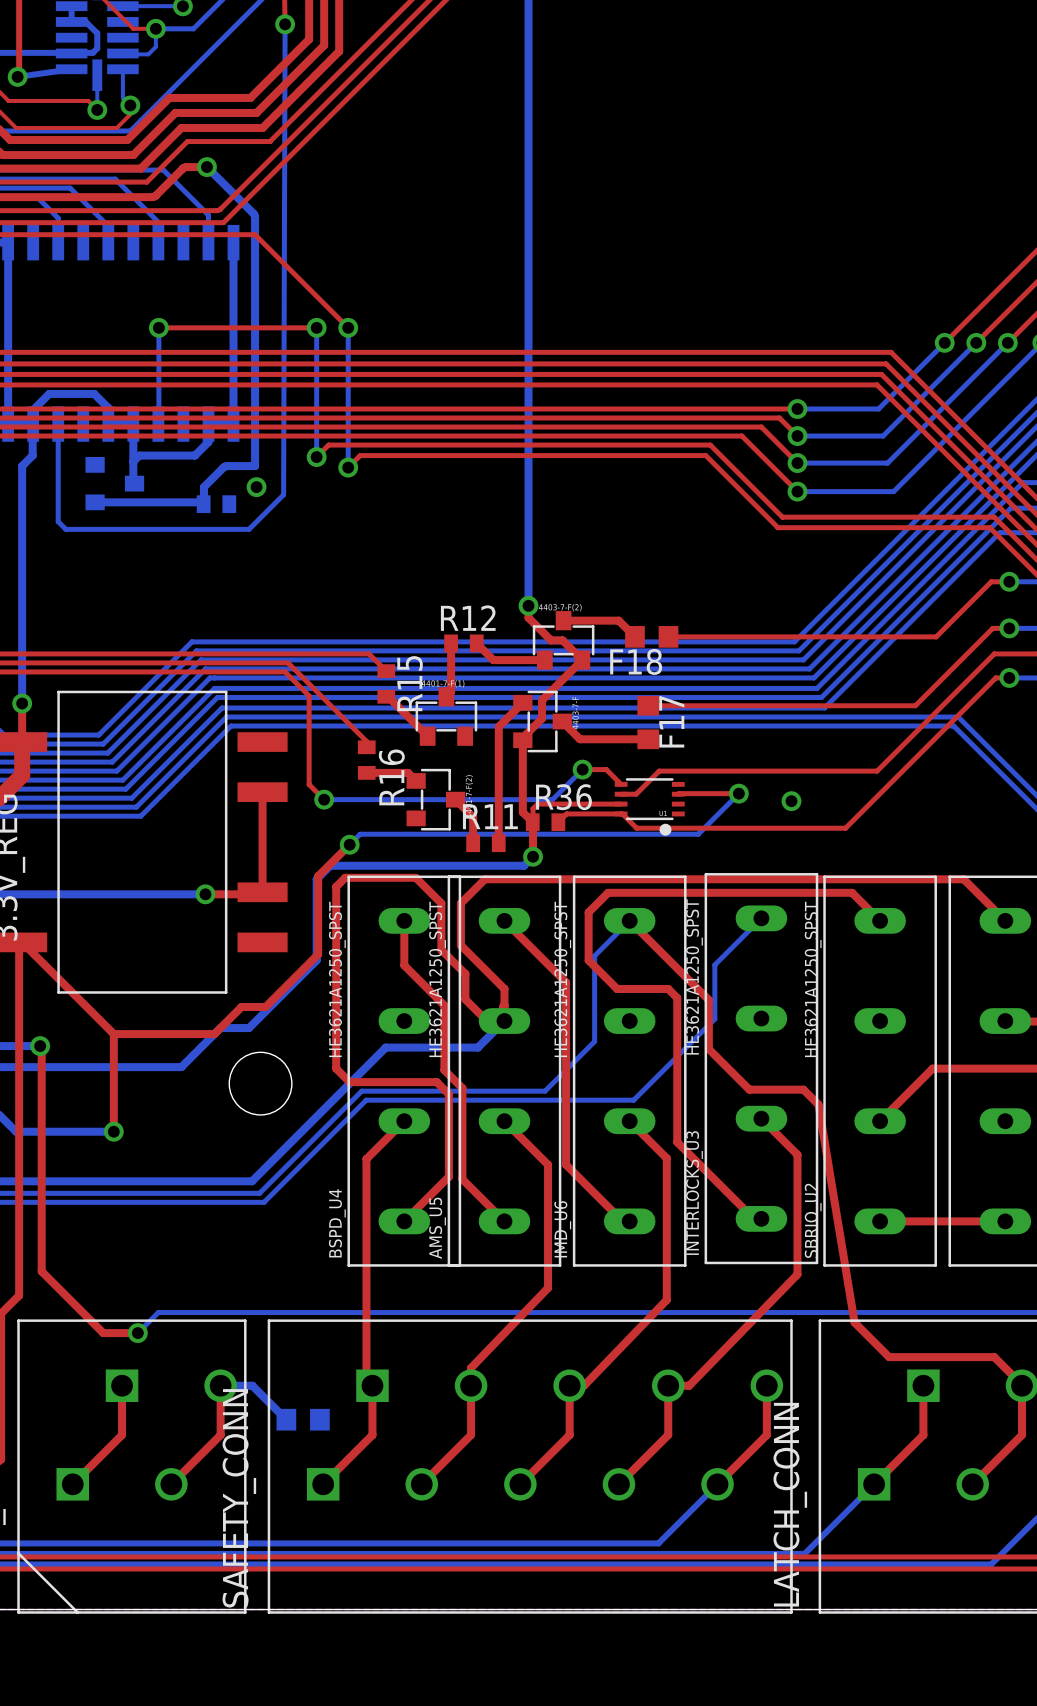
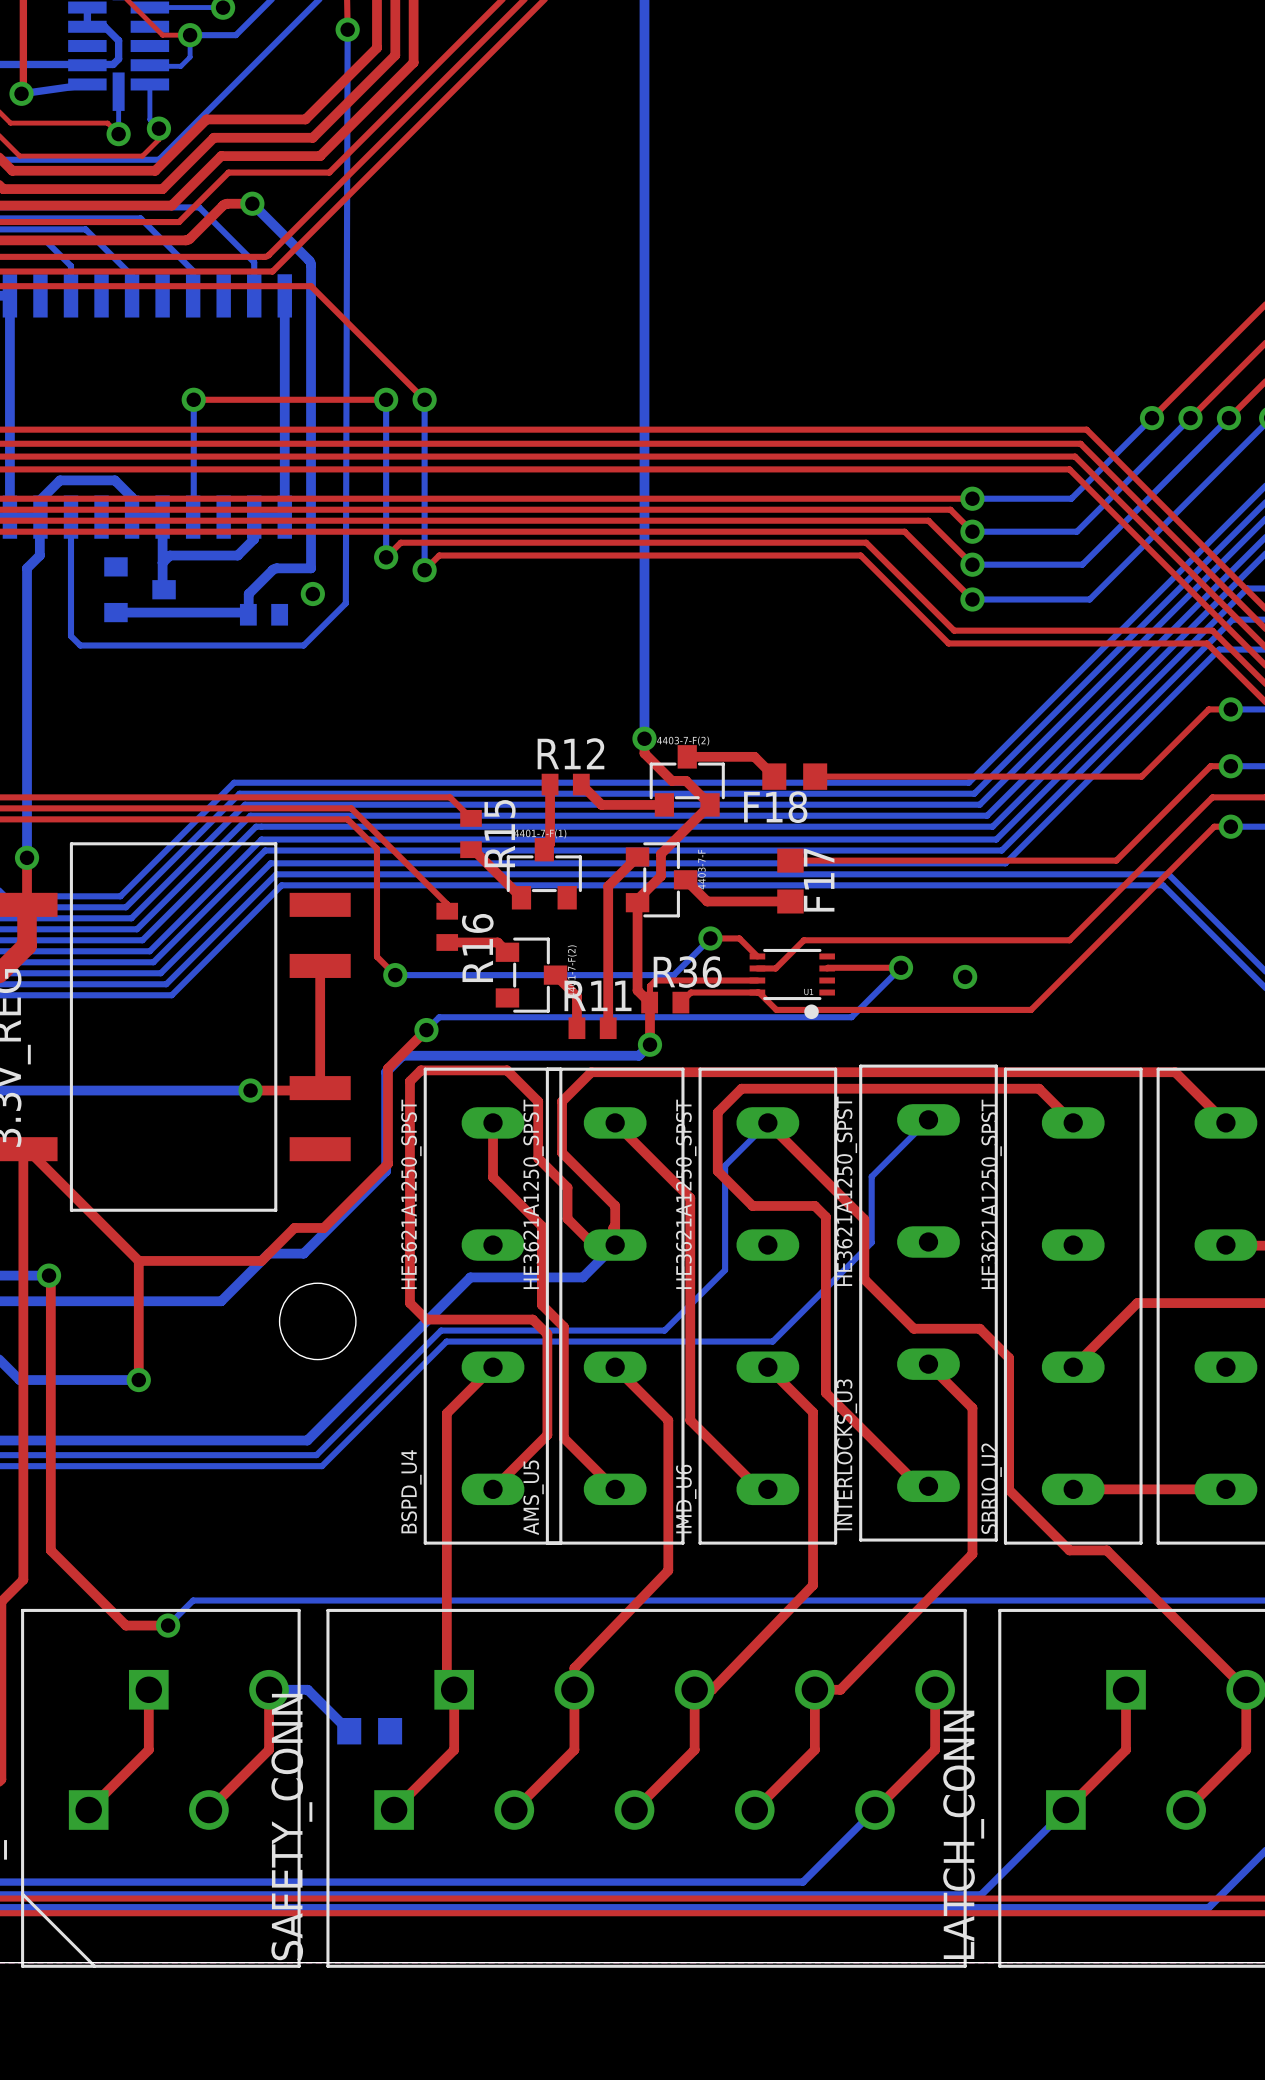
top track: (818, 1104) (854, 1322) (889, 1357) (994, 1357) (1022, 1385) -> (998, 1347) (1009, 1358) (1009, 1489) (1069, 1550) (1106, 1550) (1246, 1689)

